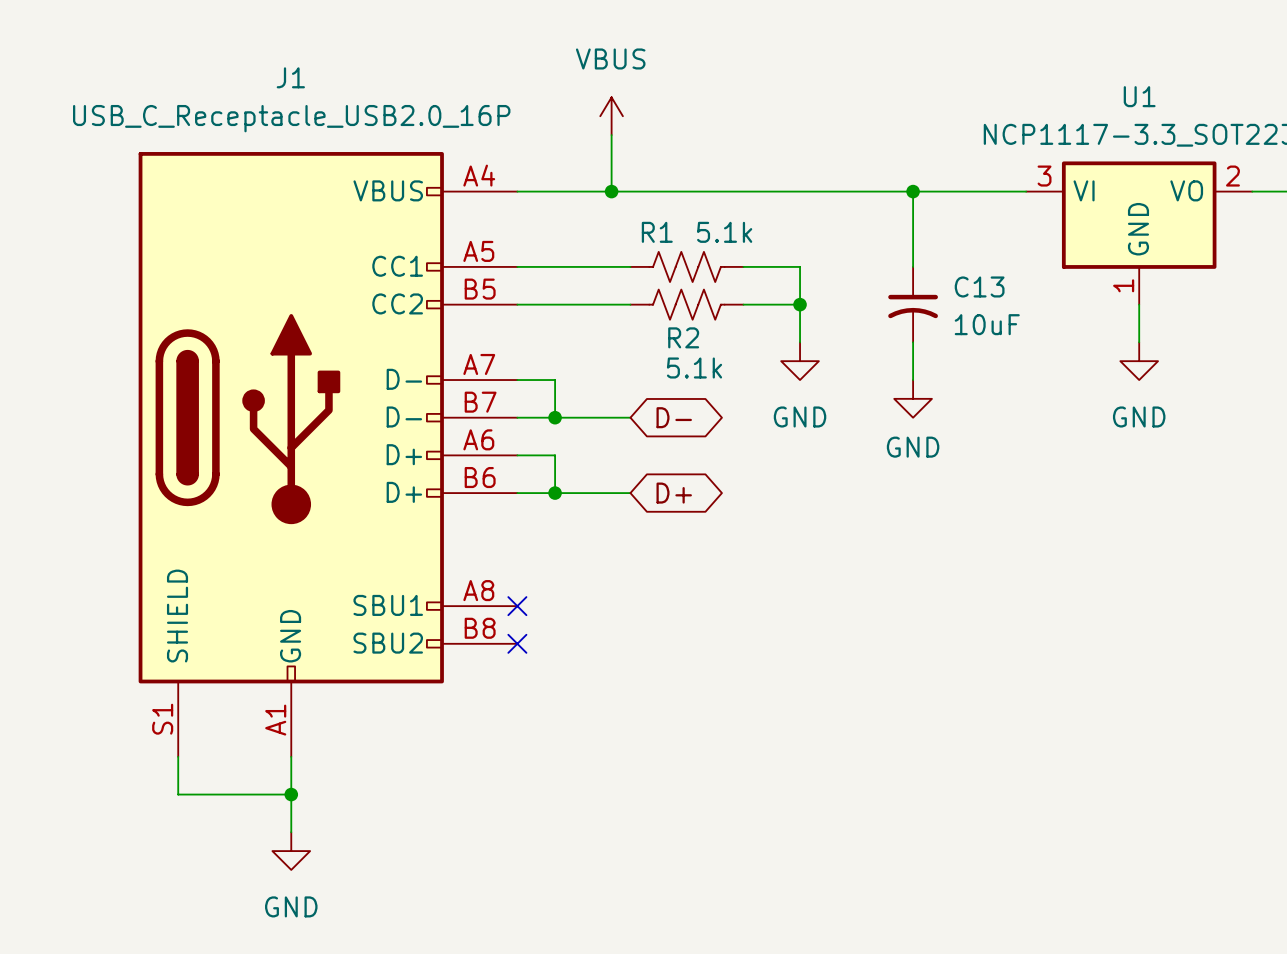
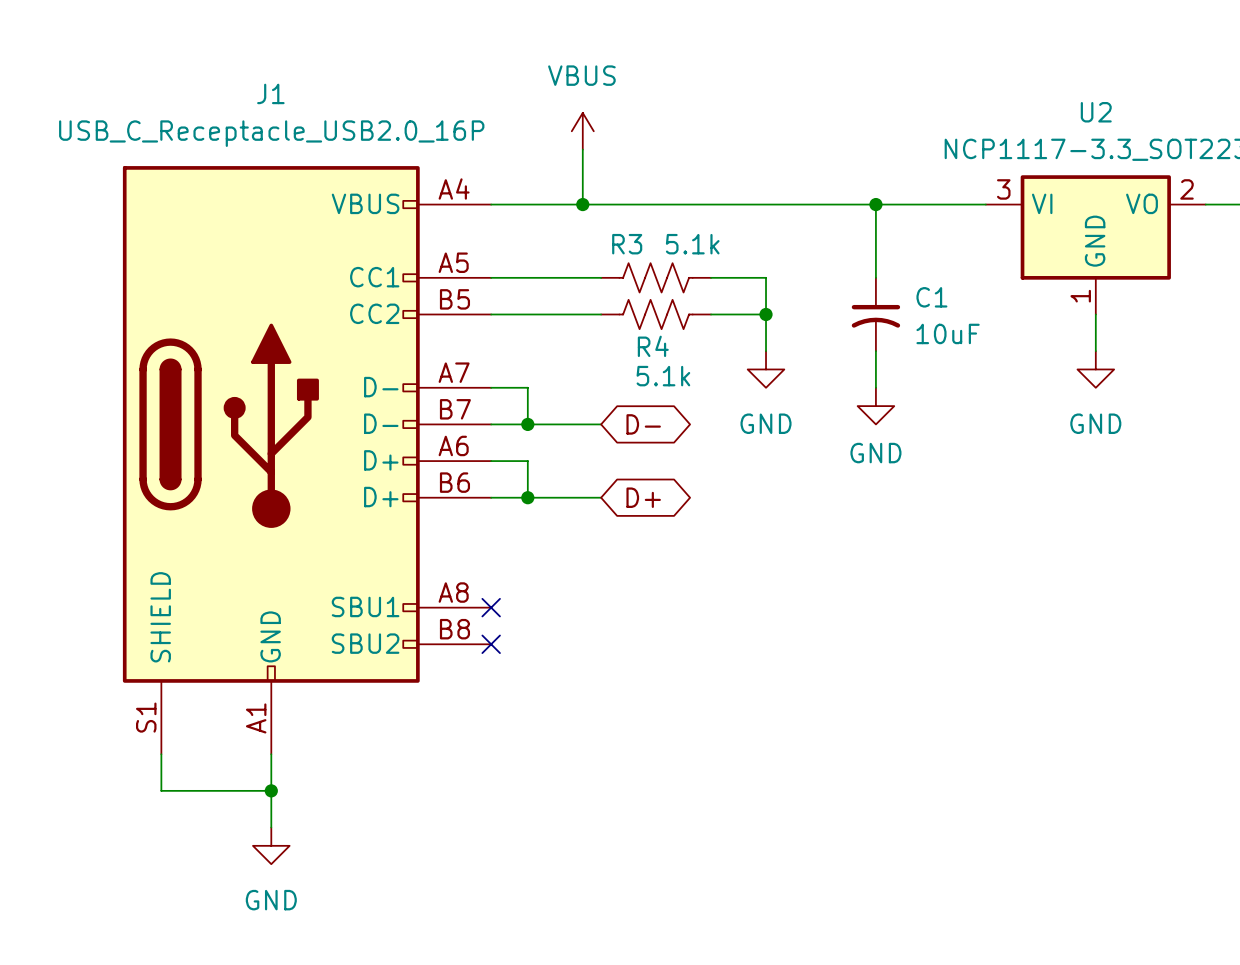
U1 name: U1 (1139, 96) -> U2 (1096, 112)
R1 name: R1 (657, 232) -> R3 (627, 244)
C13 name: C13 (979, 286) -> C1 (931, 297)
R2 name: R2 (683, 337) -> R4 (653, 346)

